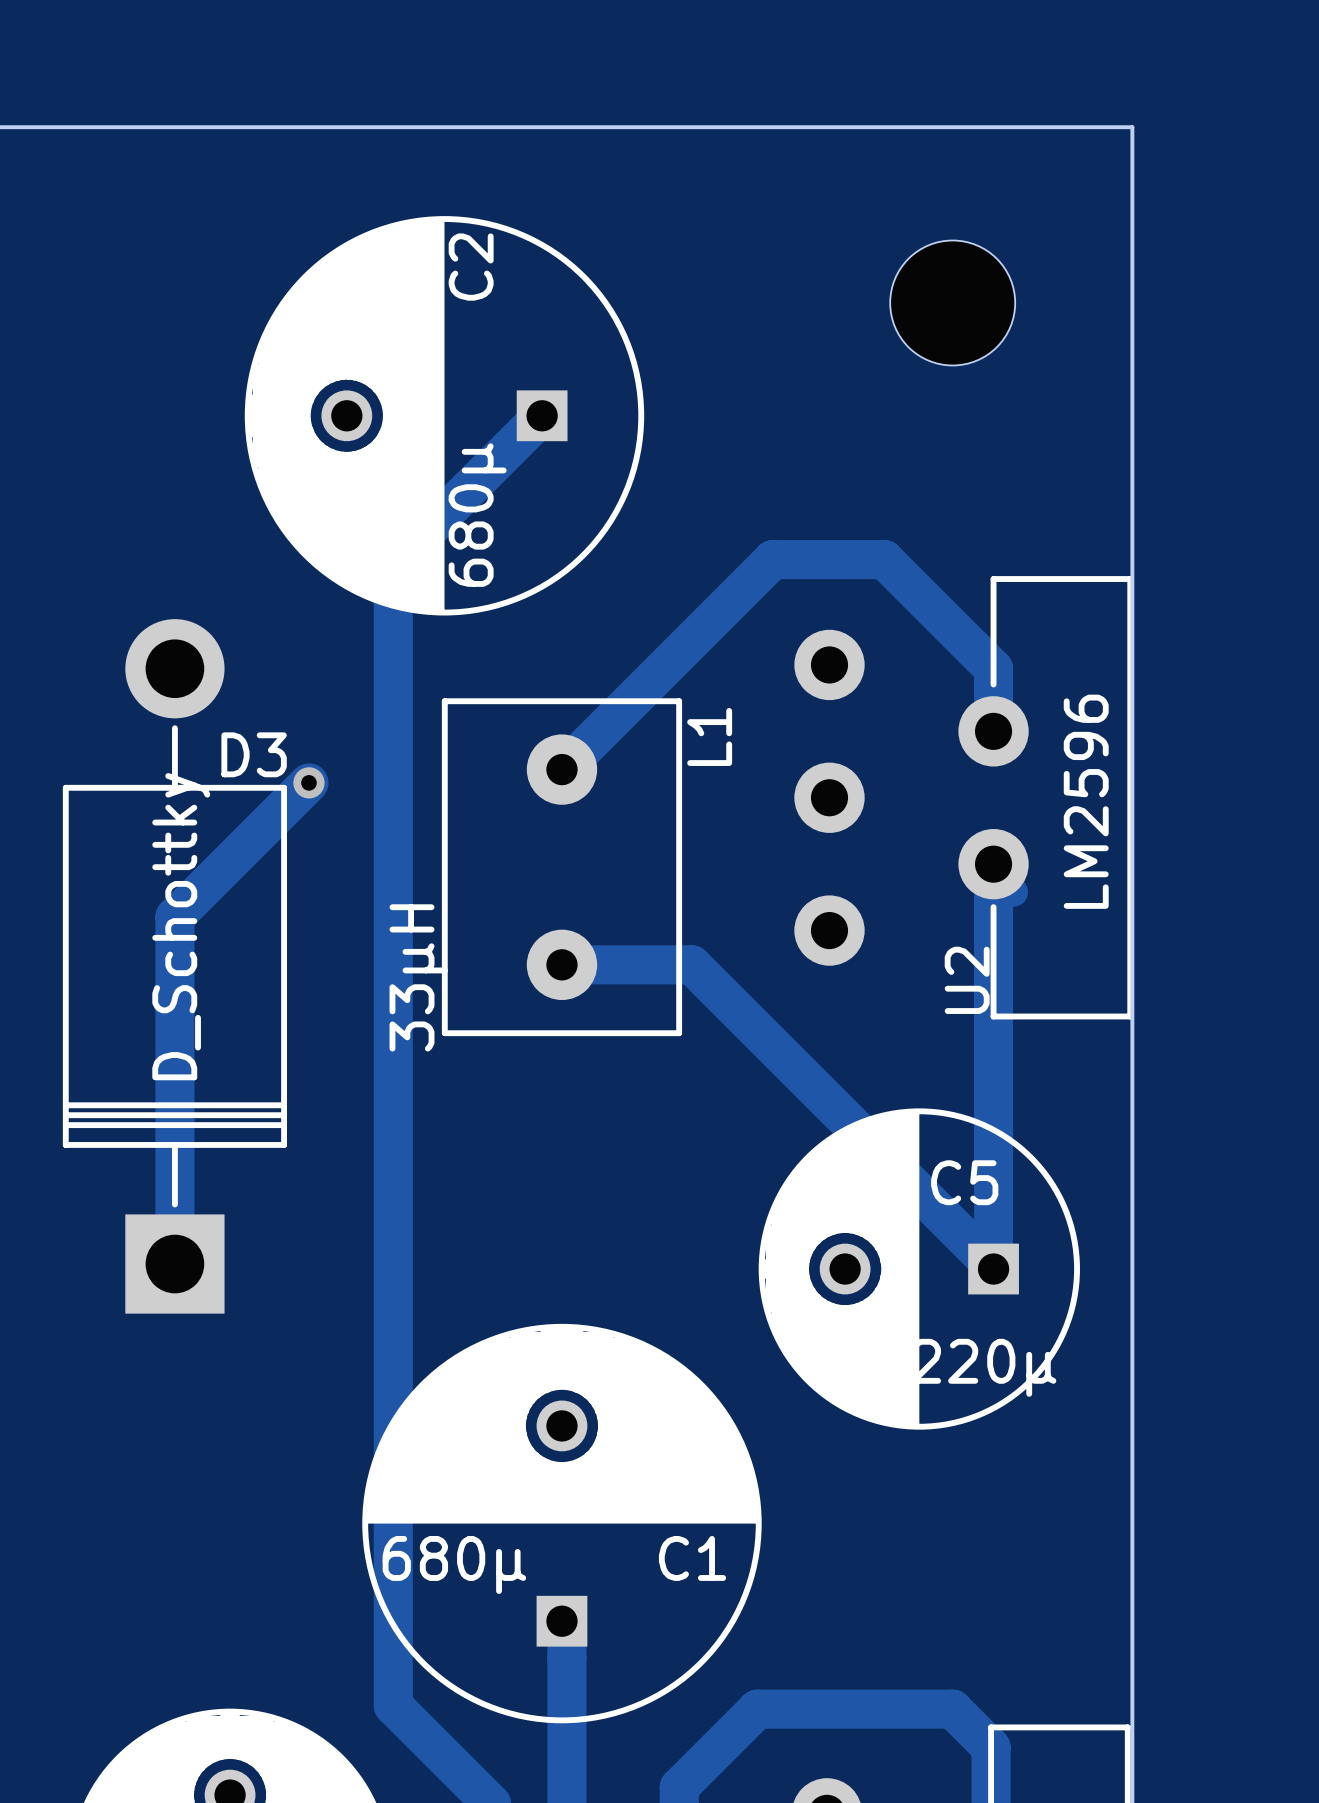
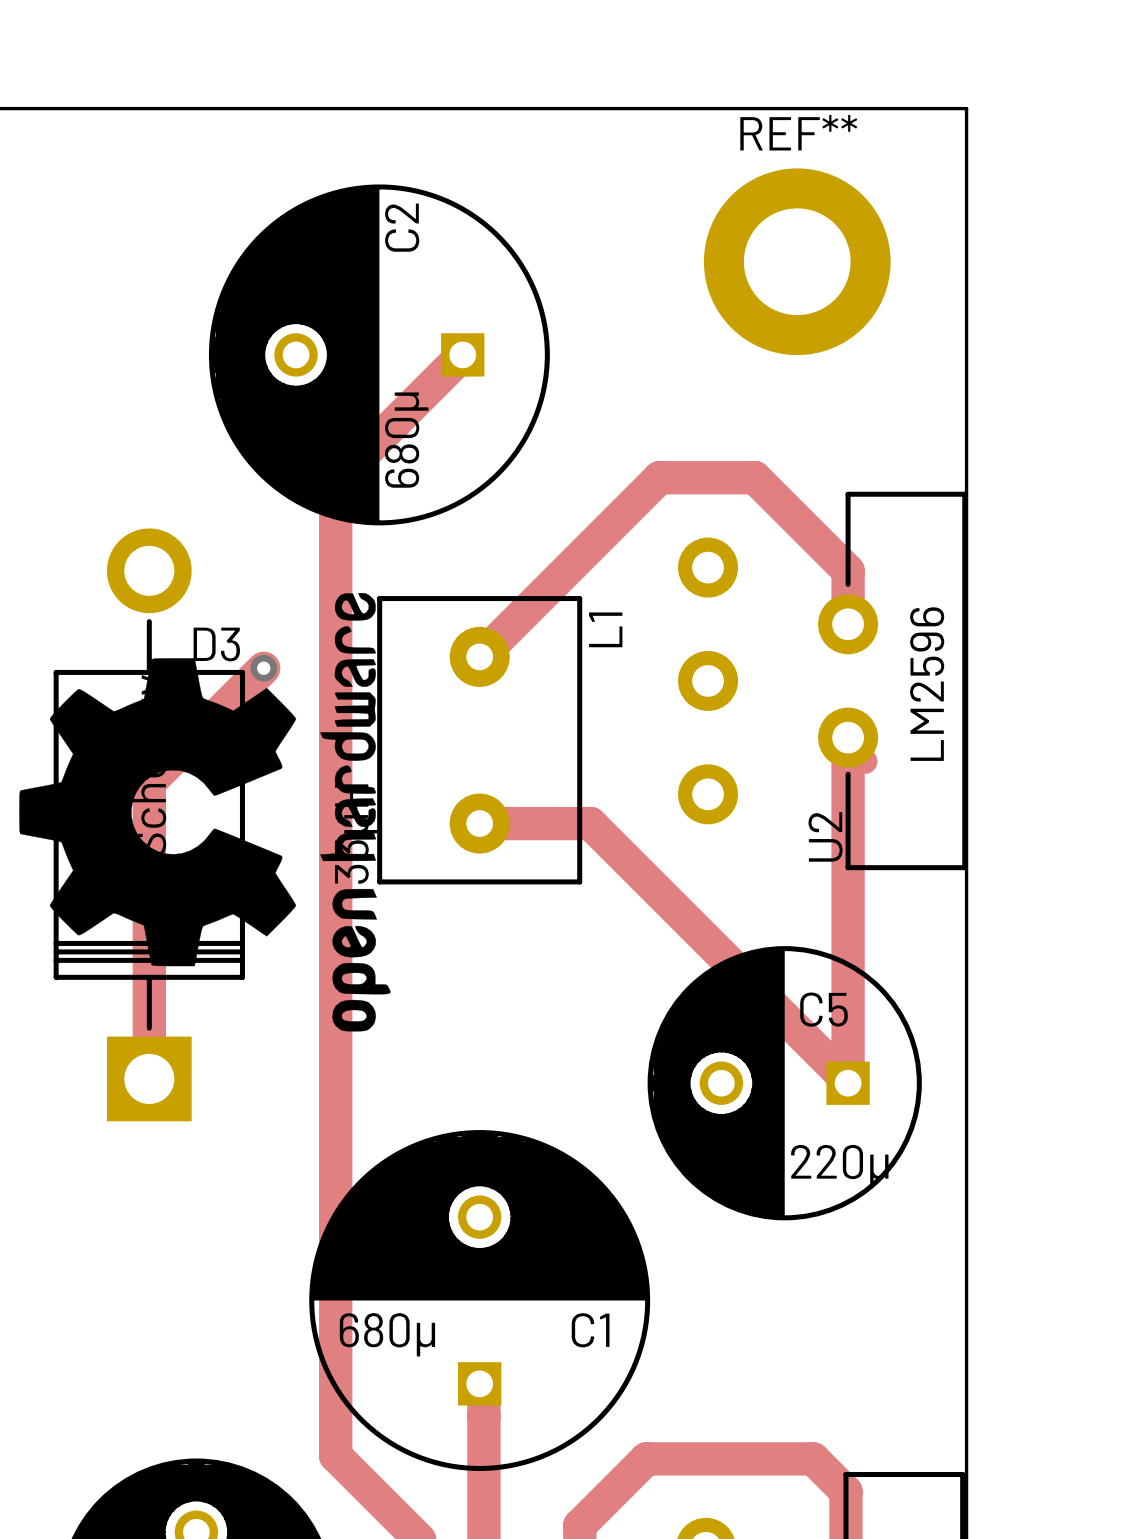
part: (952, 302) -> none
REF**: none -> (797, 261)
drawing: none -> [19, 593, 391, 1032]

